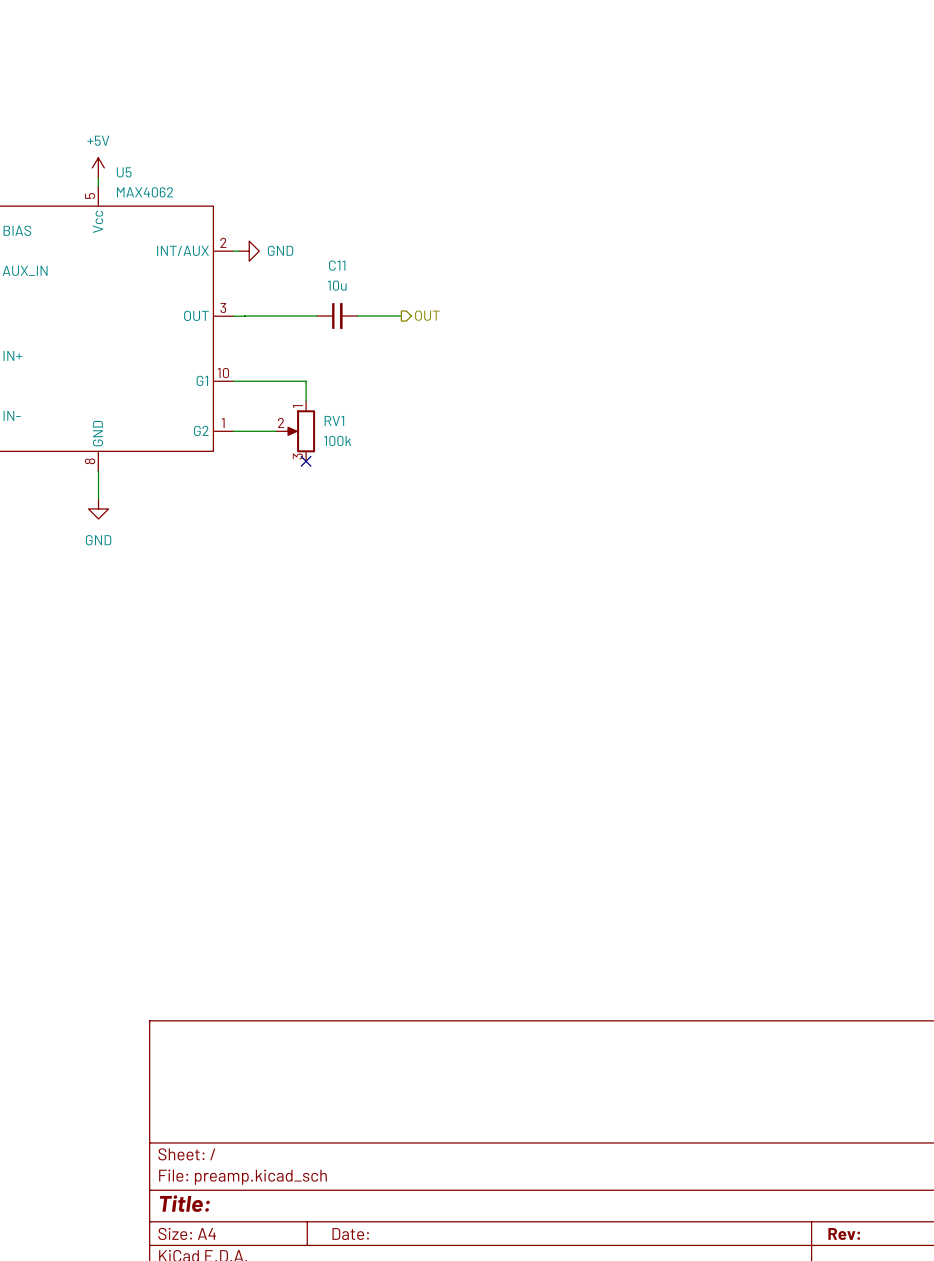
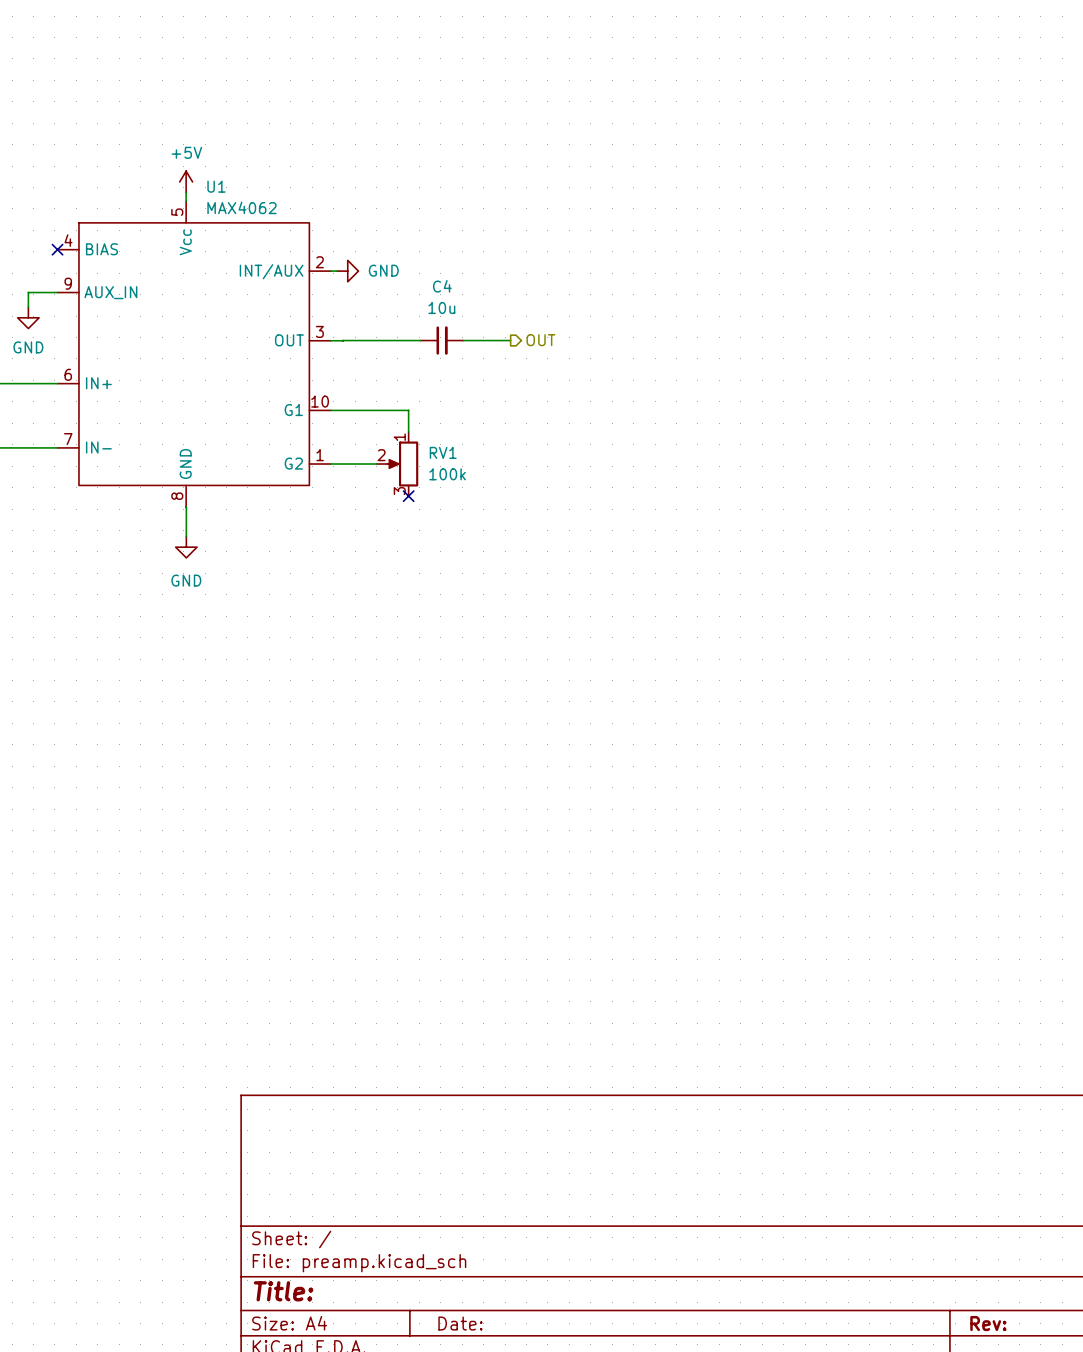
U5 name: U5 (124, 172) -> U1 (216, 186)
C11 name: C11 (337, 265) -> C4 (442, 286)

